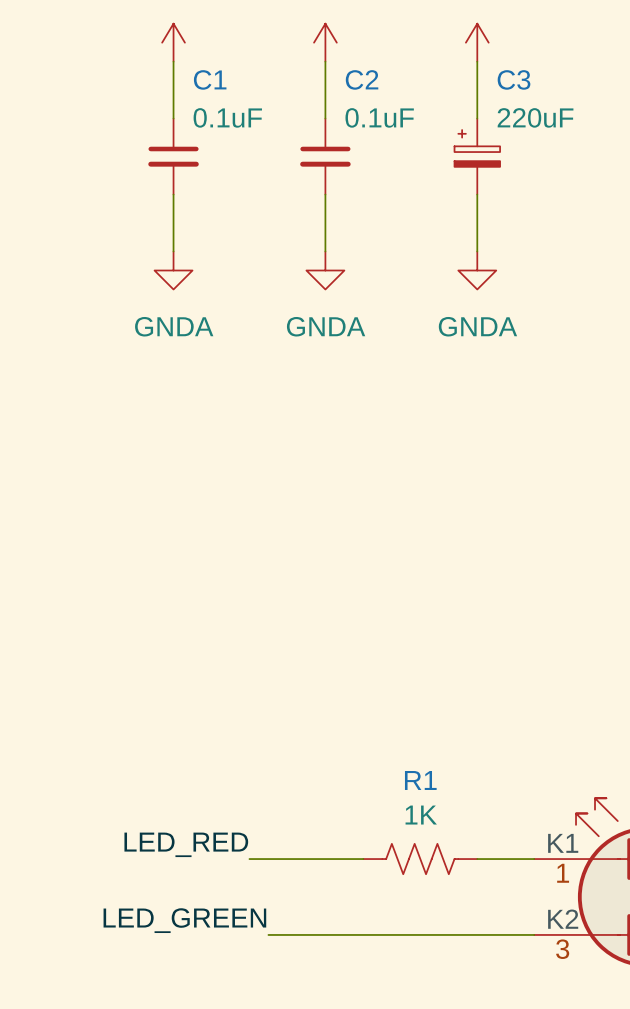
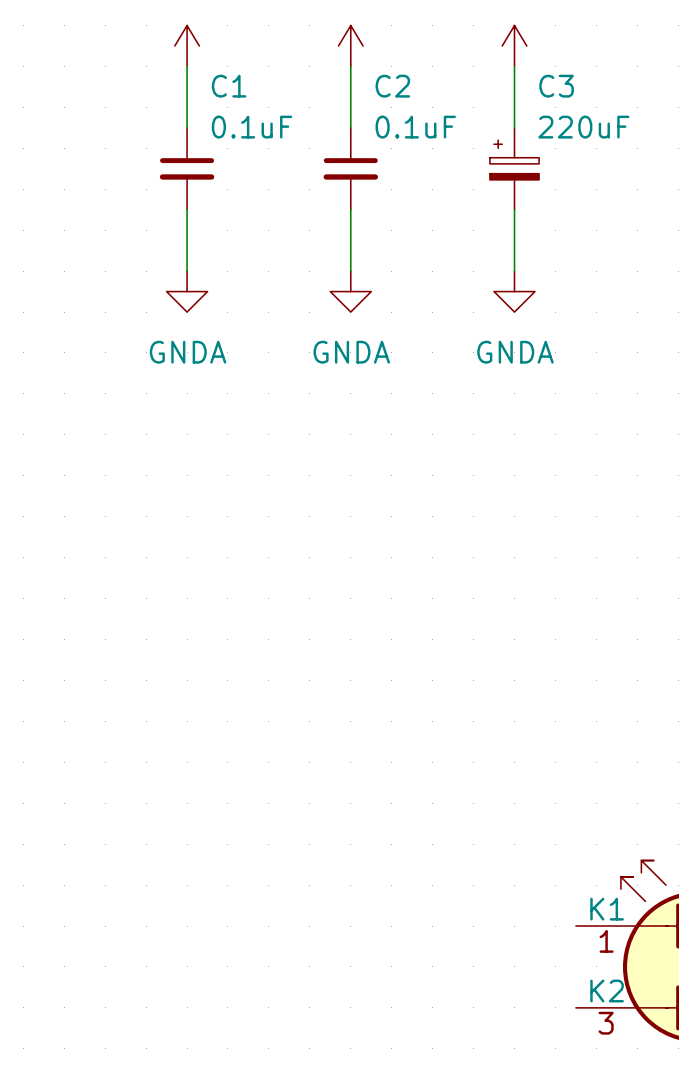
label: LED_RED (186, 844) -> none
wire: (249, 859) (363, 859) -> none
R1: 1K (420, 859) -> none
wire: (477, 859) (534, 859) -> none
label: LED_GREEN (184, 920) -> none
wire: (268, 934) (534, 934) -> none

